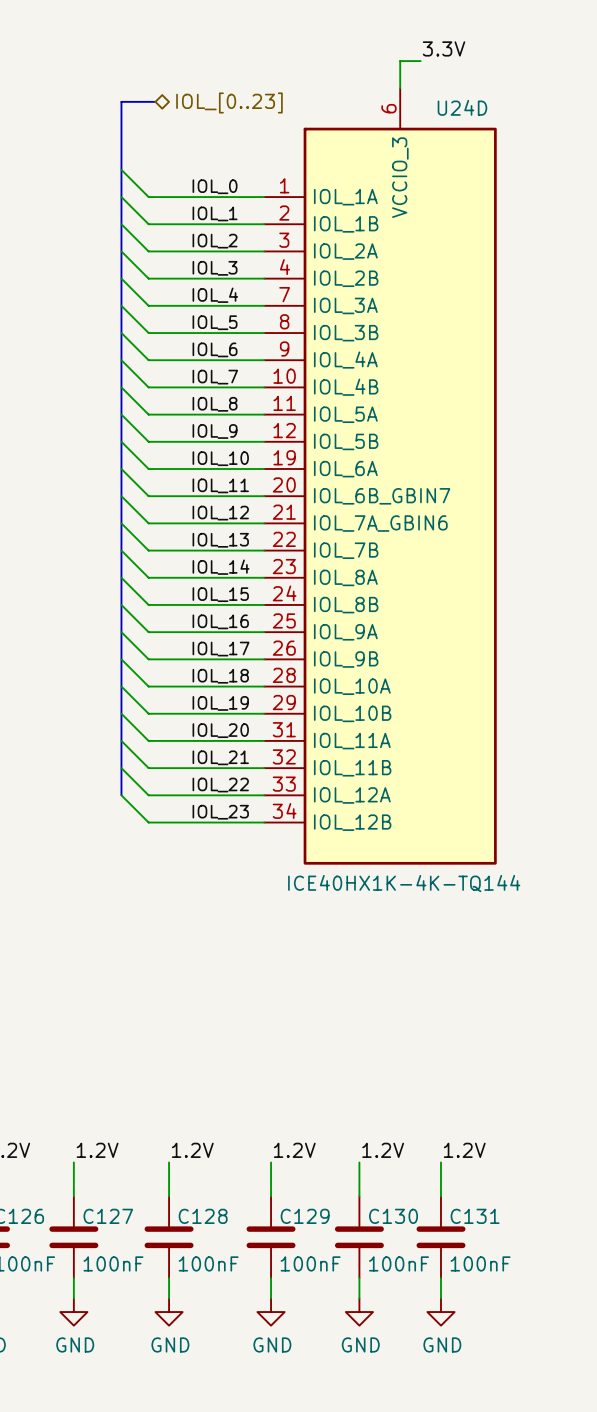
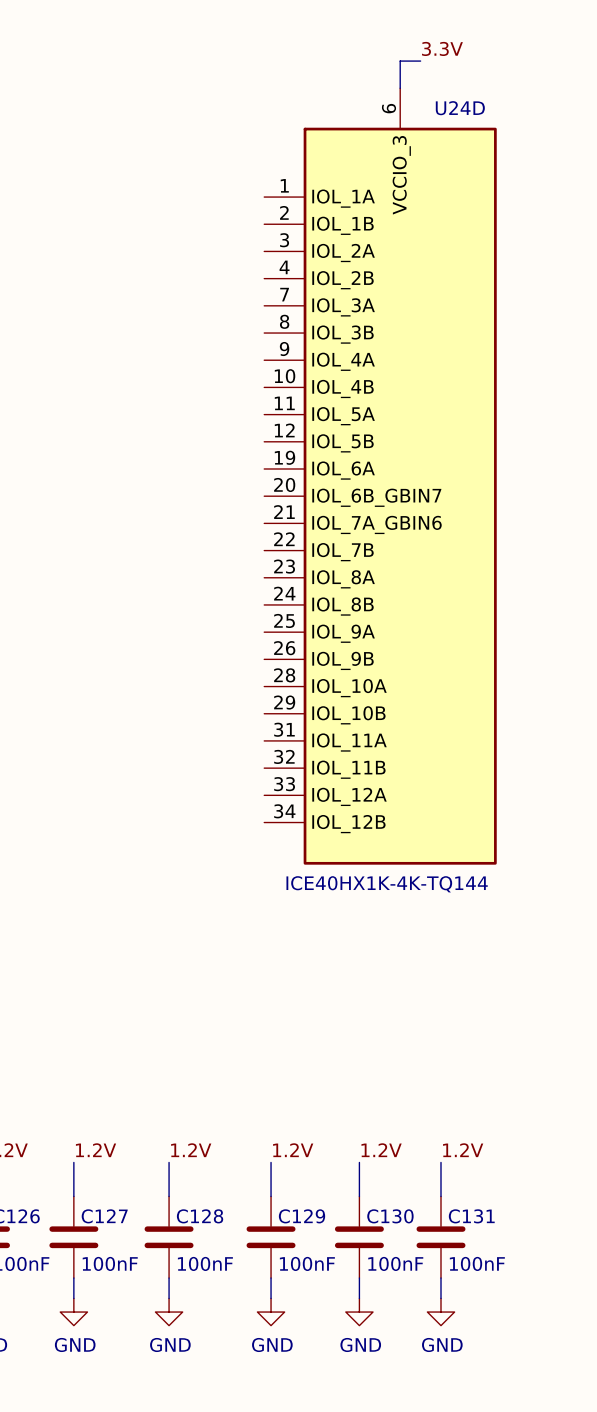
bus: (155, 101) (121, 101) (121, 795) -> none
hierarchical label: IOL_[0..23] (229, 102) -> none
wire: (121, 169) (148, 197) (264, 197) -> none
label: IOL_0 (215, 186) -> none
wire: (121, 197) (148, 224) (264, 224) -> none
label: IOL_1 (215, 213) -> none
wire: (121, 224) (148, 251) (264, 251) -> none
label: IOL_2 (215, 241) -> none
wire: (121, 251) (148, 278) (264, 278) -> none
label: IOL_3 (215, 268) -> none
wire: (121, 278) (148, 305) (264, 305) -> none
label: IOL_4 (215, 295) -> none
wire: (121, 305) (148, 333) (264, 333) -> none
label: IOL_5 (215, 322) -> none
wire: (121, 333) (148, 360) (264, 360) -> none
label: IOL_6 (215, 349) -> none
wire: (121, 360) (148, 387) (264, 387) -> none
label: IOL_7 (215, 377) -> none
wire: (121, 387) (148, 414) (264, 414) -> none
label: IOL_8 (215, 404) -> none
wire: (121, 414) (148, 441) (264, 441) -> none
label: IOL_9 (215, 431) -> none
wire: (121, 441) (148, 468) (264, 468) -> none
label: IOL_10 (220, 458) -> none
wire: (121, 468) (148, 496) (264, 496) -> none
label: IOL_11 (220, 485) -> none
wire: (121, 496) (148, 523) (264, 523) -> none
label: IOL_12 (220, 513) -> none
wire: (121, 523) (148, 550) (264, 550) -> none
label: IOL_13 (220, 540) -> none
wire: (121, 550) (148, 577) (264, 577) -> none
label: IOL_14 (221, 567) -> none
wire: (121, 577) (148, 604) (264, 604) -> none
label: IOL_15 (220, 594) -> none
wire: (121, 604) (148, 632) (264, 632) -> none
label: IOL_16 (220, 621) -> none
wire: (121, 632) (148, 659) (264, 659) -> none
label: IOL_17 (221, 649) -> none
wire: (121, 659) (148, 686) (264, 686) -> none
label: IOL_18 (220, 676) -> none
wire: (121, 686) (148, 713) (264, 713) -> none
label: IOL_19 (220, 703) -> none
wire: (121, 713) (148, 740) (264, 740) -> none
label: IOL_20 (220, 730) -> none
wire: (121, 740) (148, 768) (264, 768) -> none
label: IOL_21 (220, 757) -> none
wire: (121, 768) (148, 795) (264, 795) -> none
label: IOL_22 (220, 785) -> none
wire: (121, 795) (148, 822) (264, 822) -> none
label: IOL_23 (220, 812) -> none

